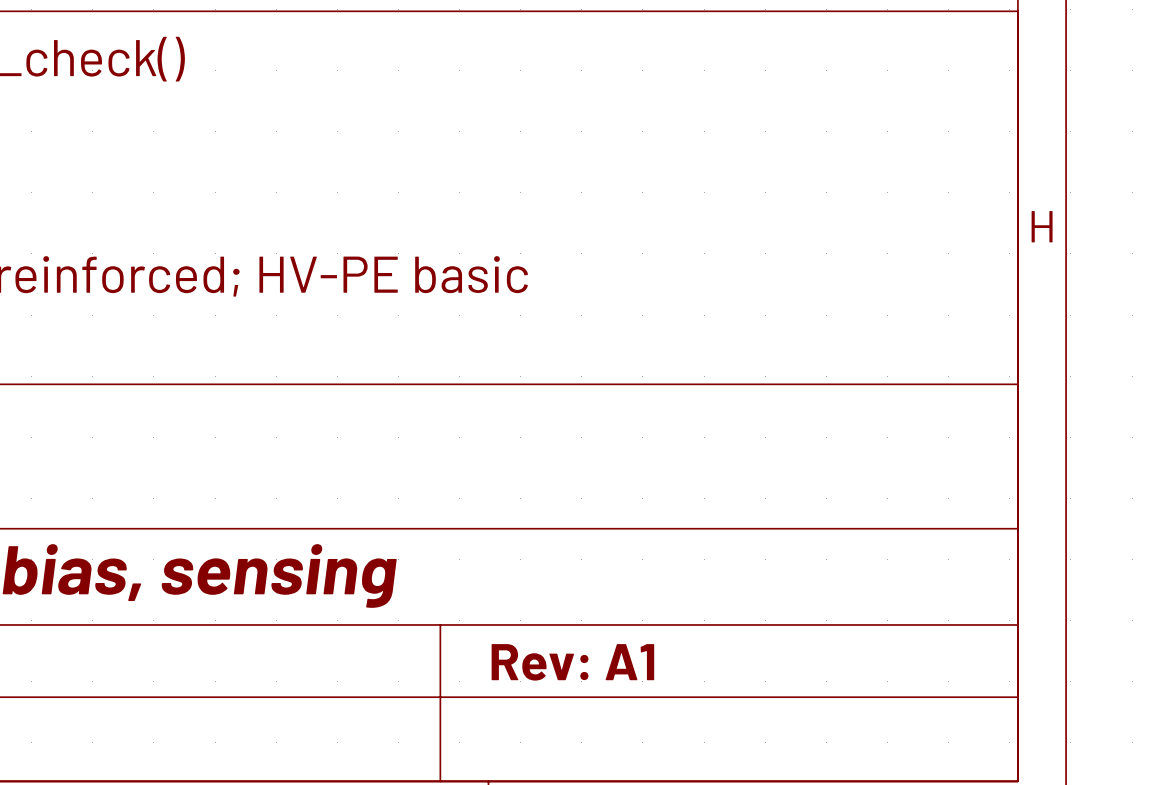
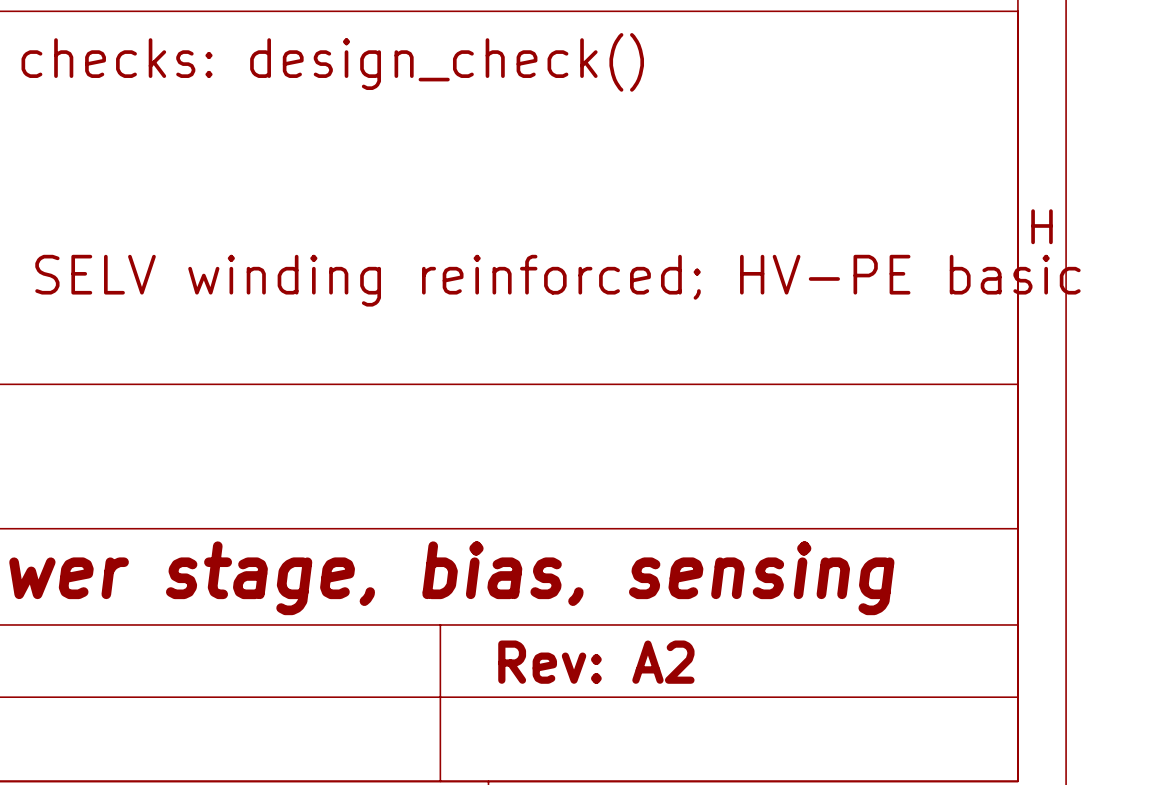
title block: Rev: A1 (572, 662) -> Rev: A2 (596, 662)

